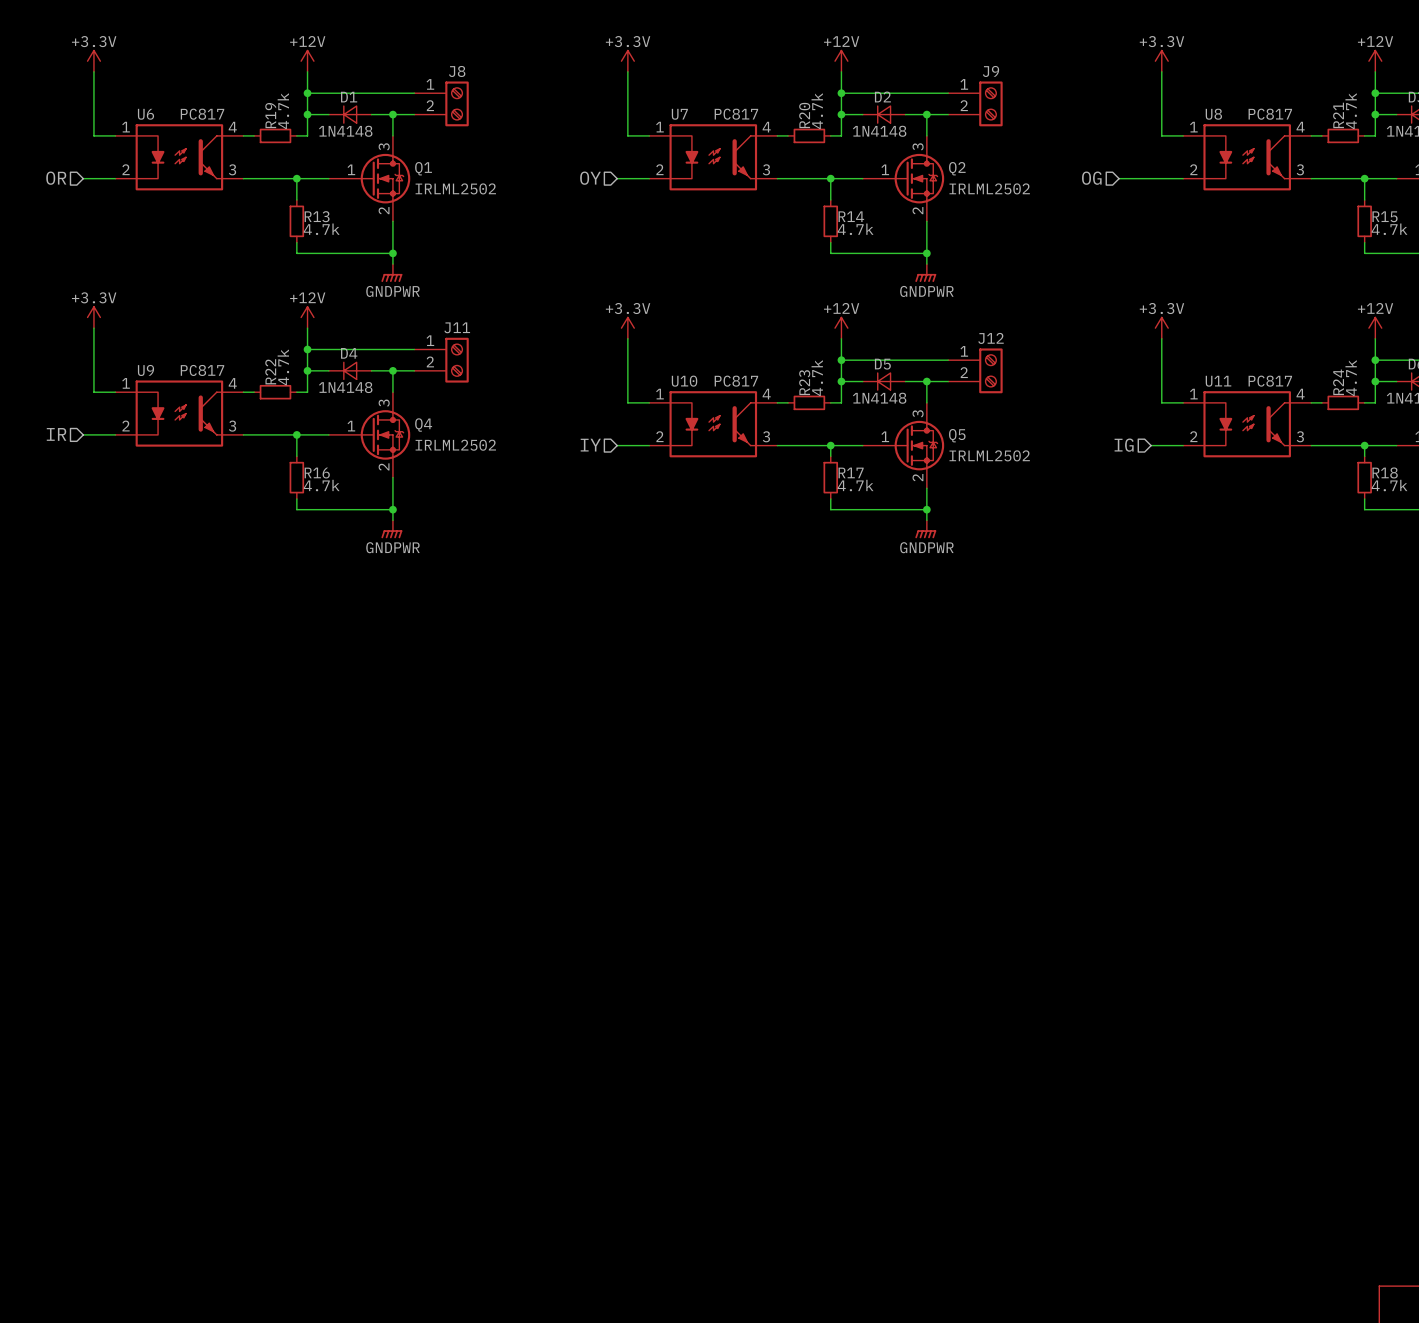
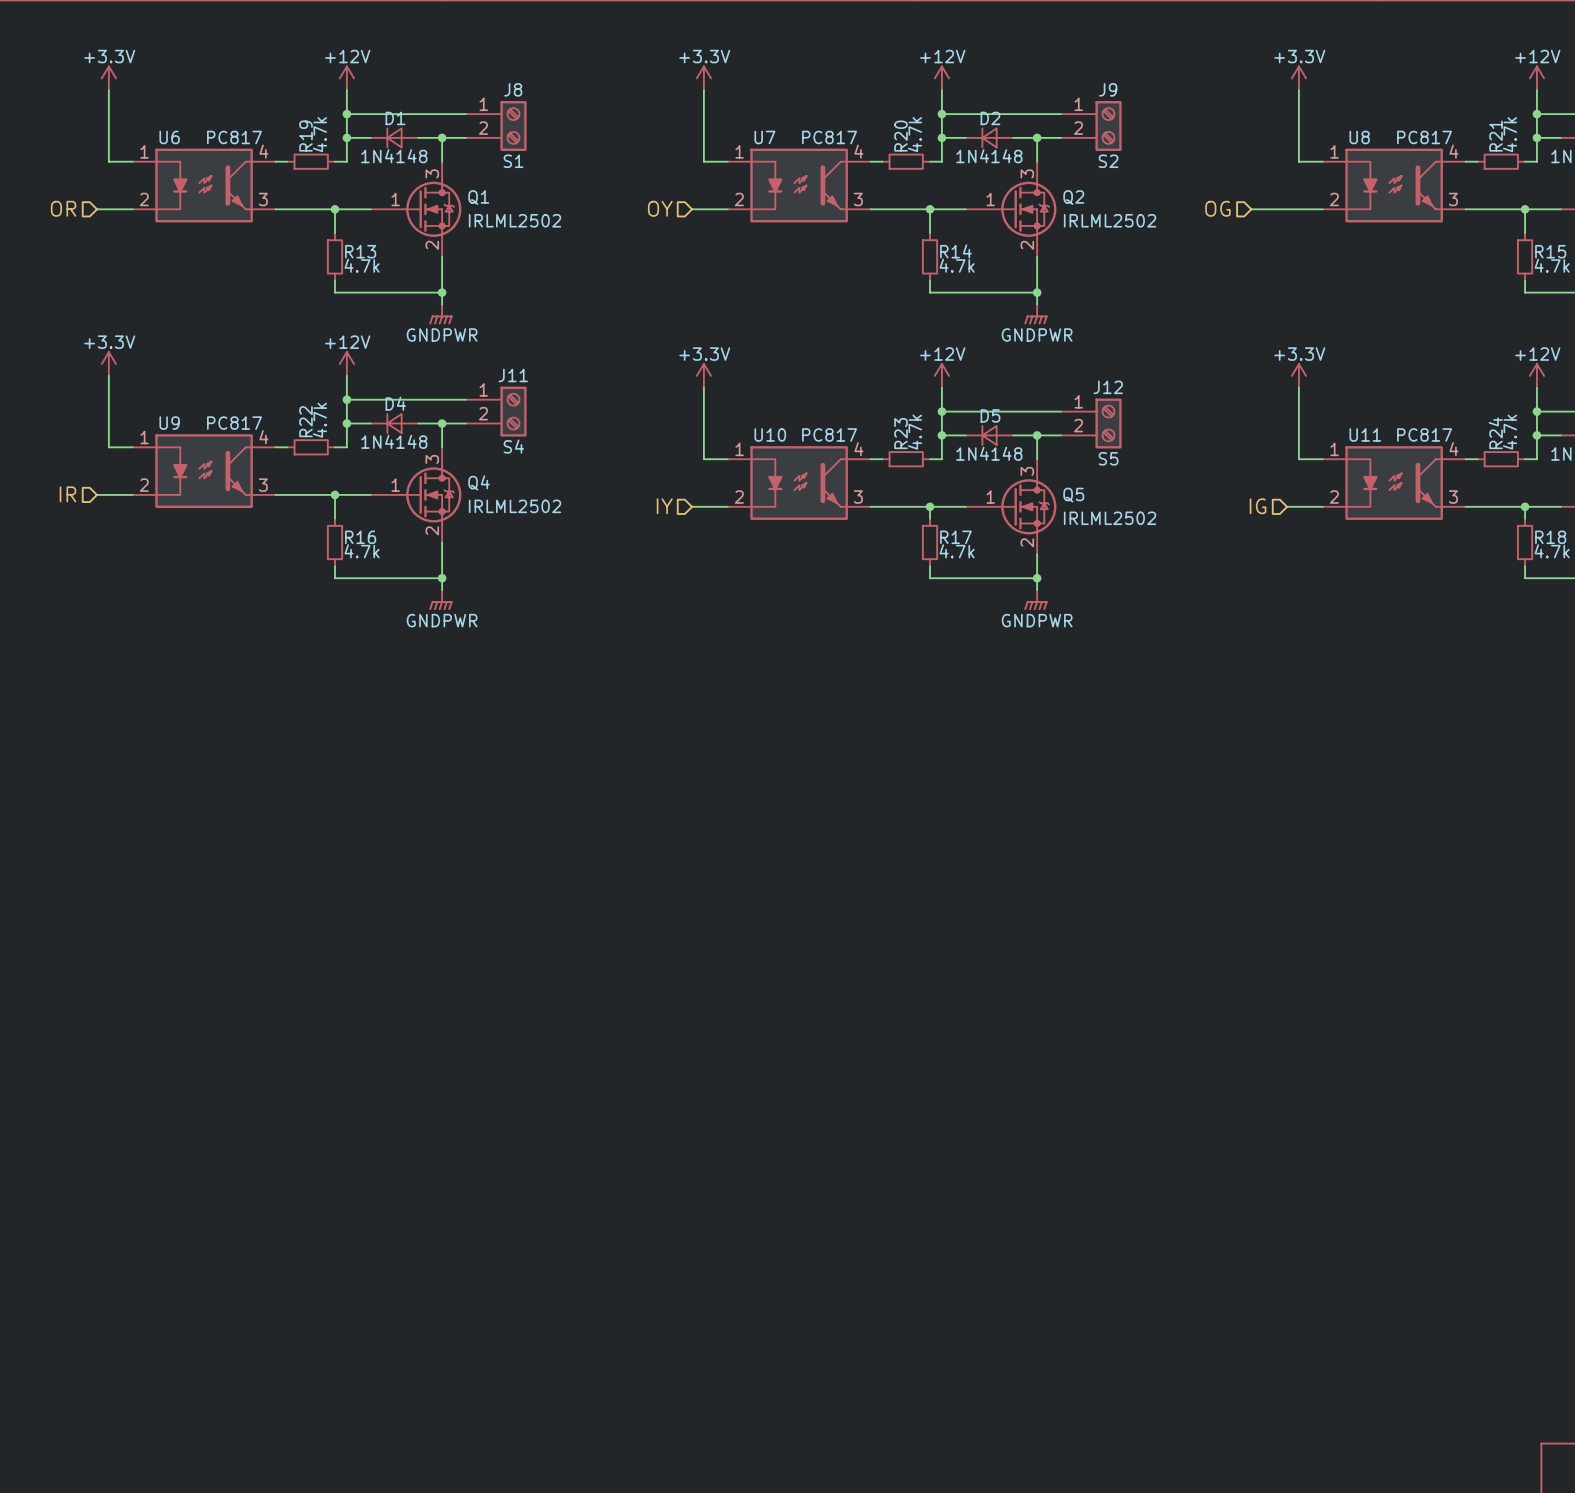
J8 value: none -> S1 (513, 161)
J9 value: none -> S2 (1108, 161)
J11 value: none -> S4 (513, 446)
J12 value: none -> S5 (1108, 458)

